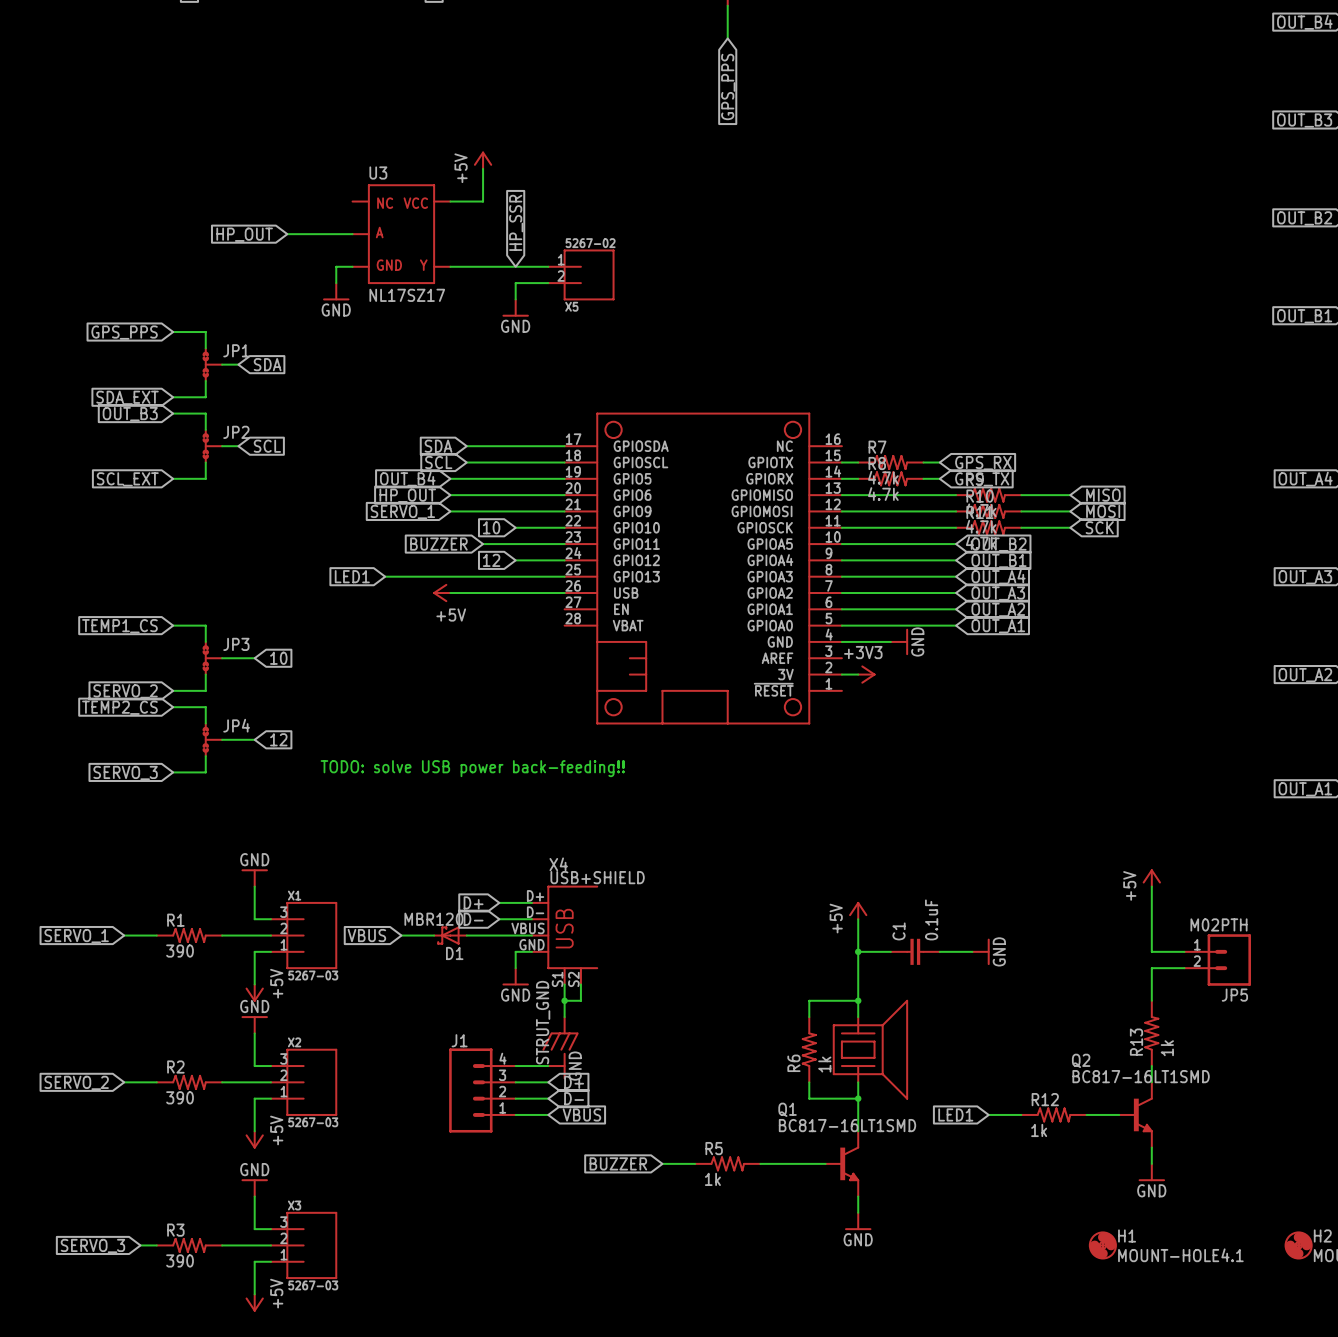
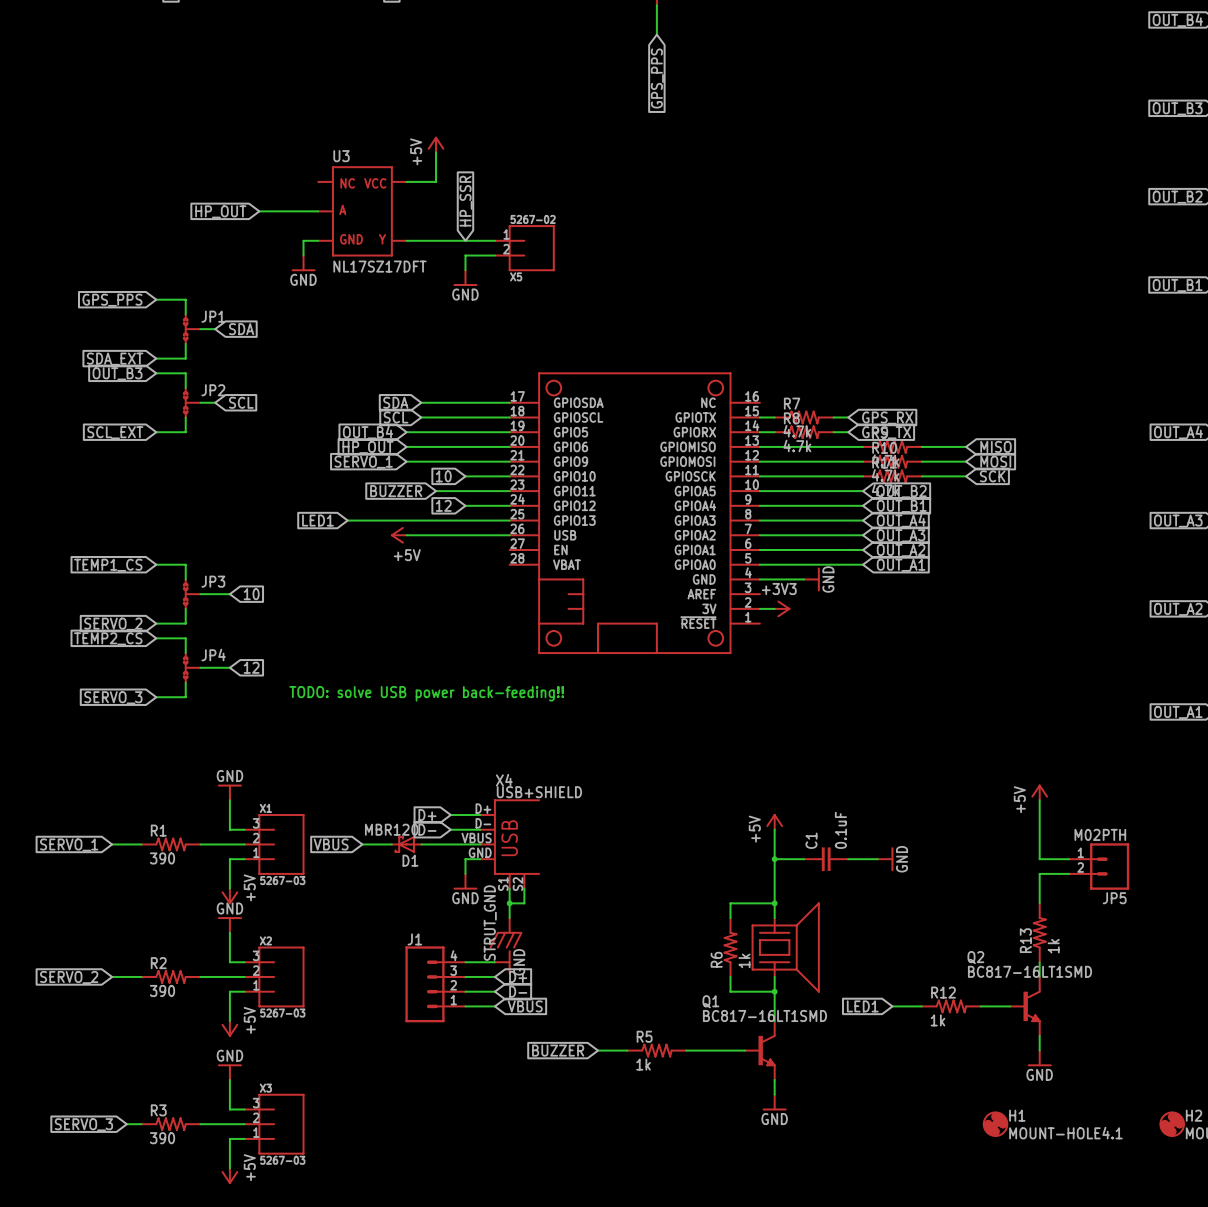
U3 value: NL17SZ17 (407, 295) -> NL17SZ17DFT (379, 266)

